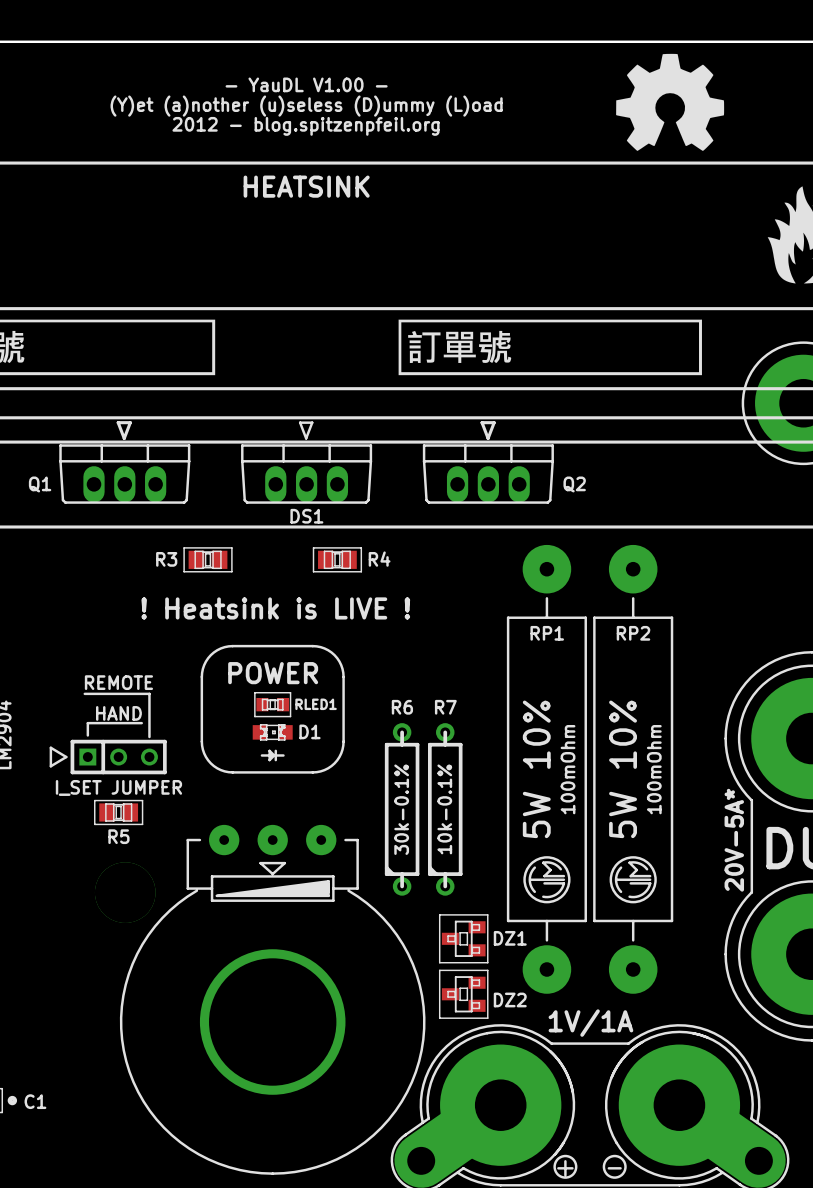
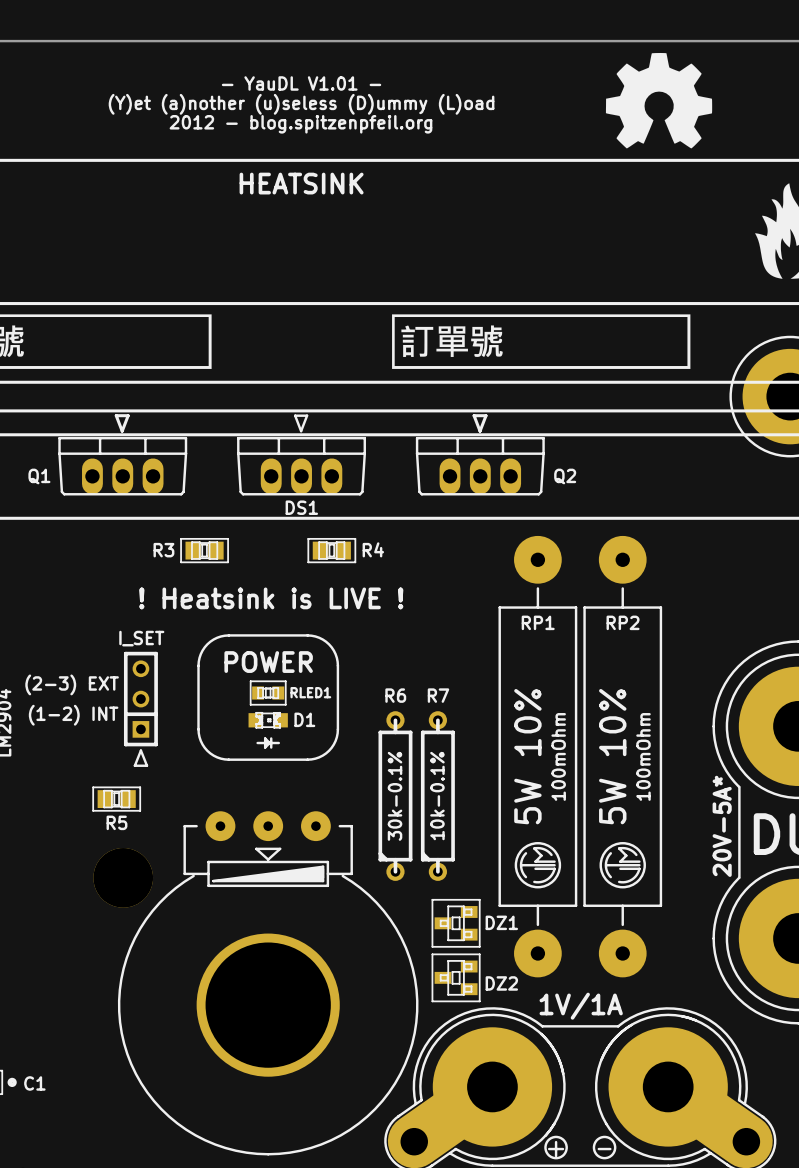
text: - YauDL V1.00 - (306, 84) -> - YauDL V1.01 - (301, 83)
text: none -> I_SET (141, 638)
text: REMOTE (118, 682) -> none
line: (84, 693) (149, 693) (149, 737) -> none
text: none -> (2-3) EXT (72, 684)
text: HAND (118, 713) -> none
line: (141, 723) (87, 723) (87, 735) -> none
text: none -> (1-2) INT (73, 715)
line: (50, 747) (50, 766) (66, 757) (50, 747) -> none
part rotation: 0° (118, 757) -> 90° counterclockwise (140, 699)
line: none -> (140, 750) (146, 765) (134, 765) (140, 750)
text: I_SET JUMPER (118, 787) -> none

